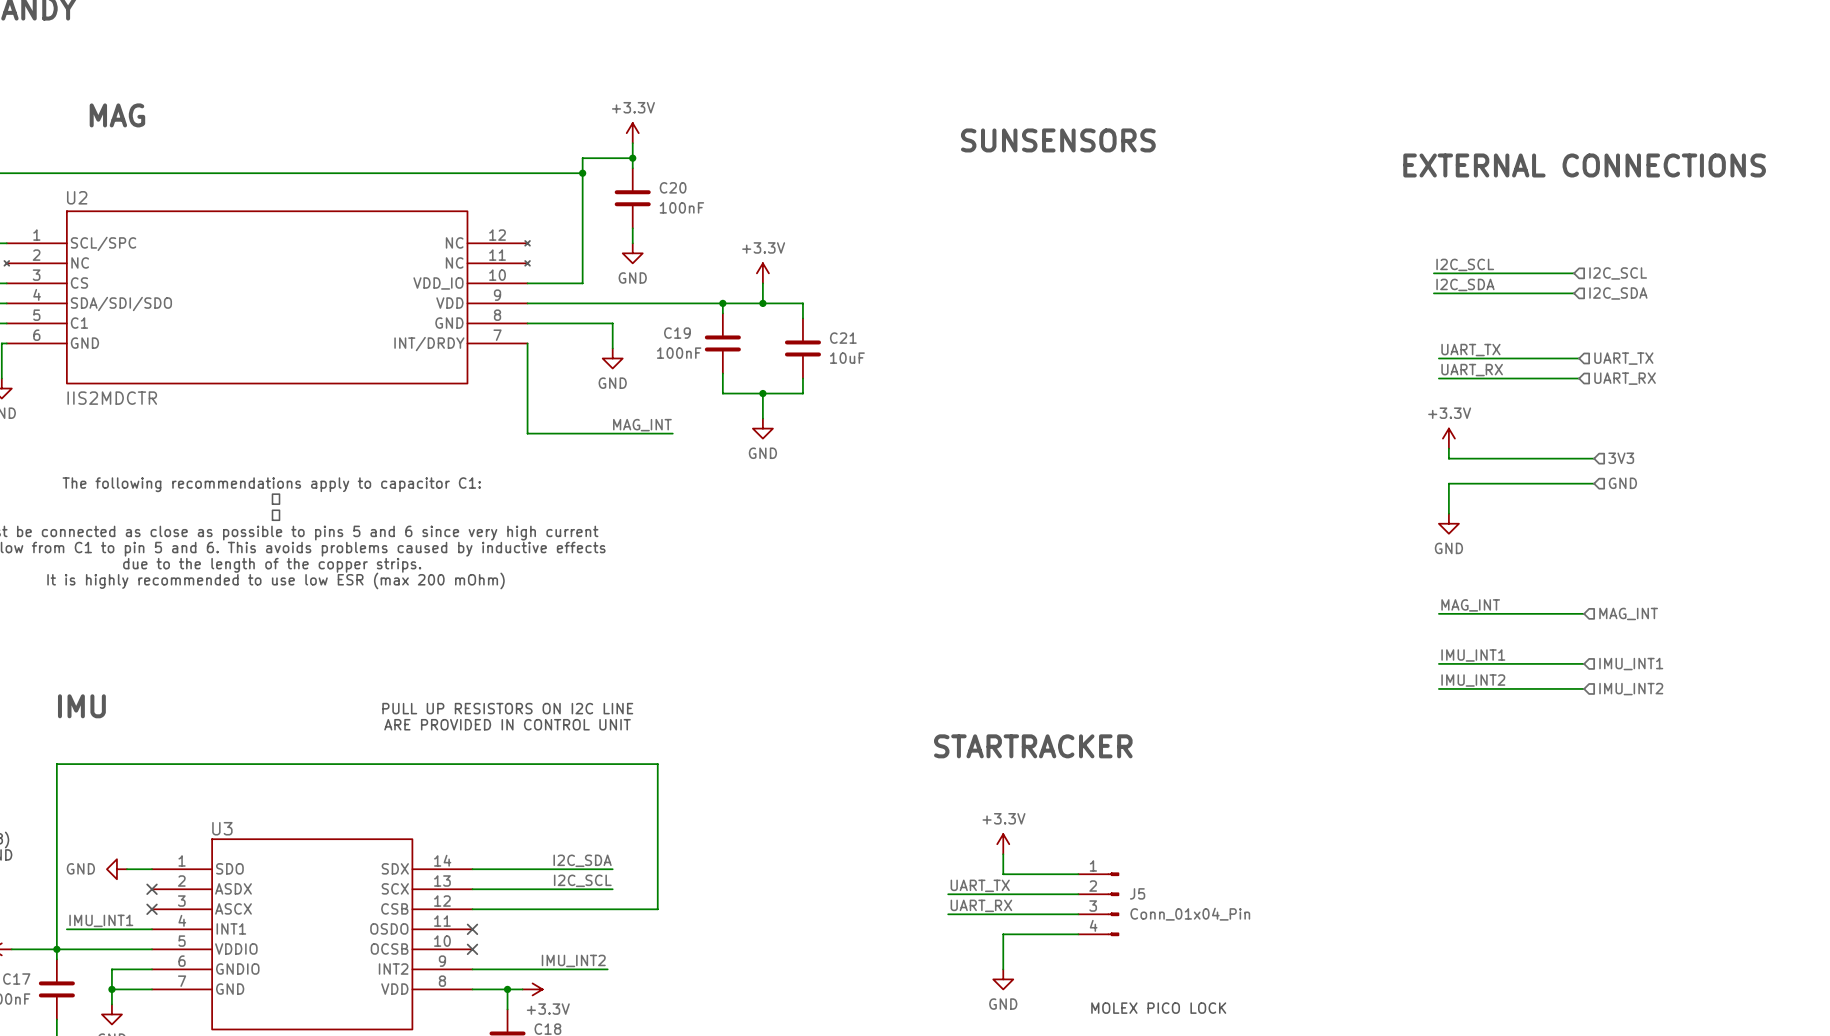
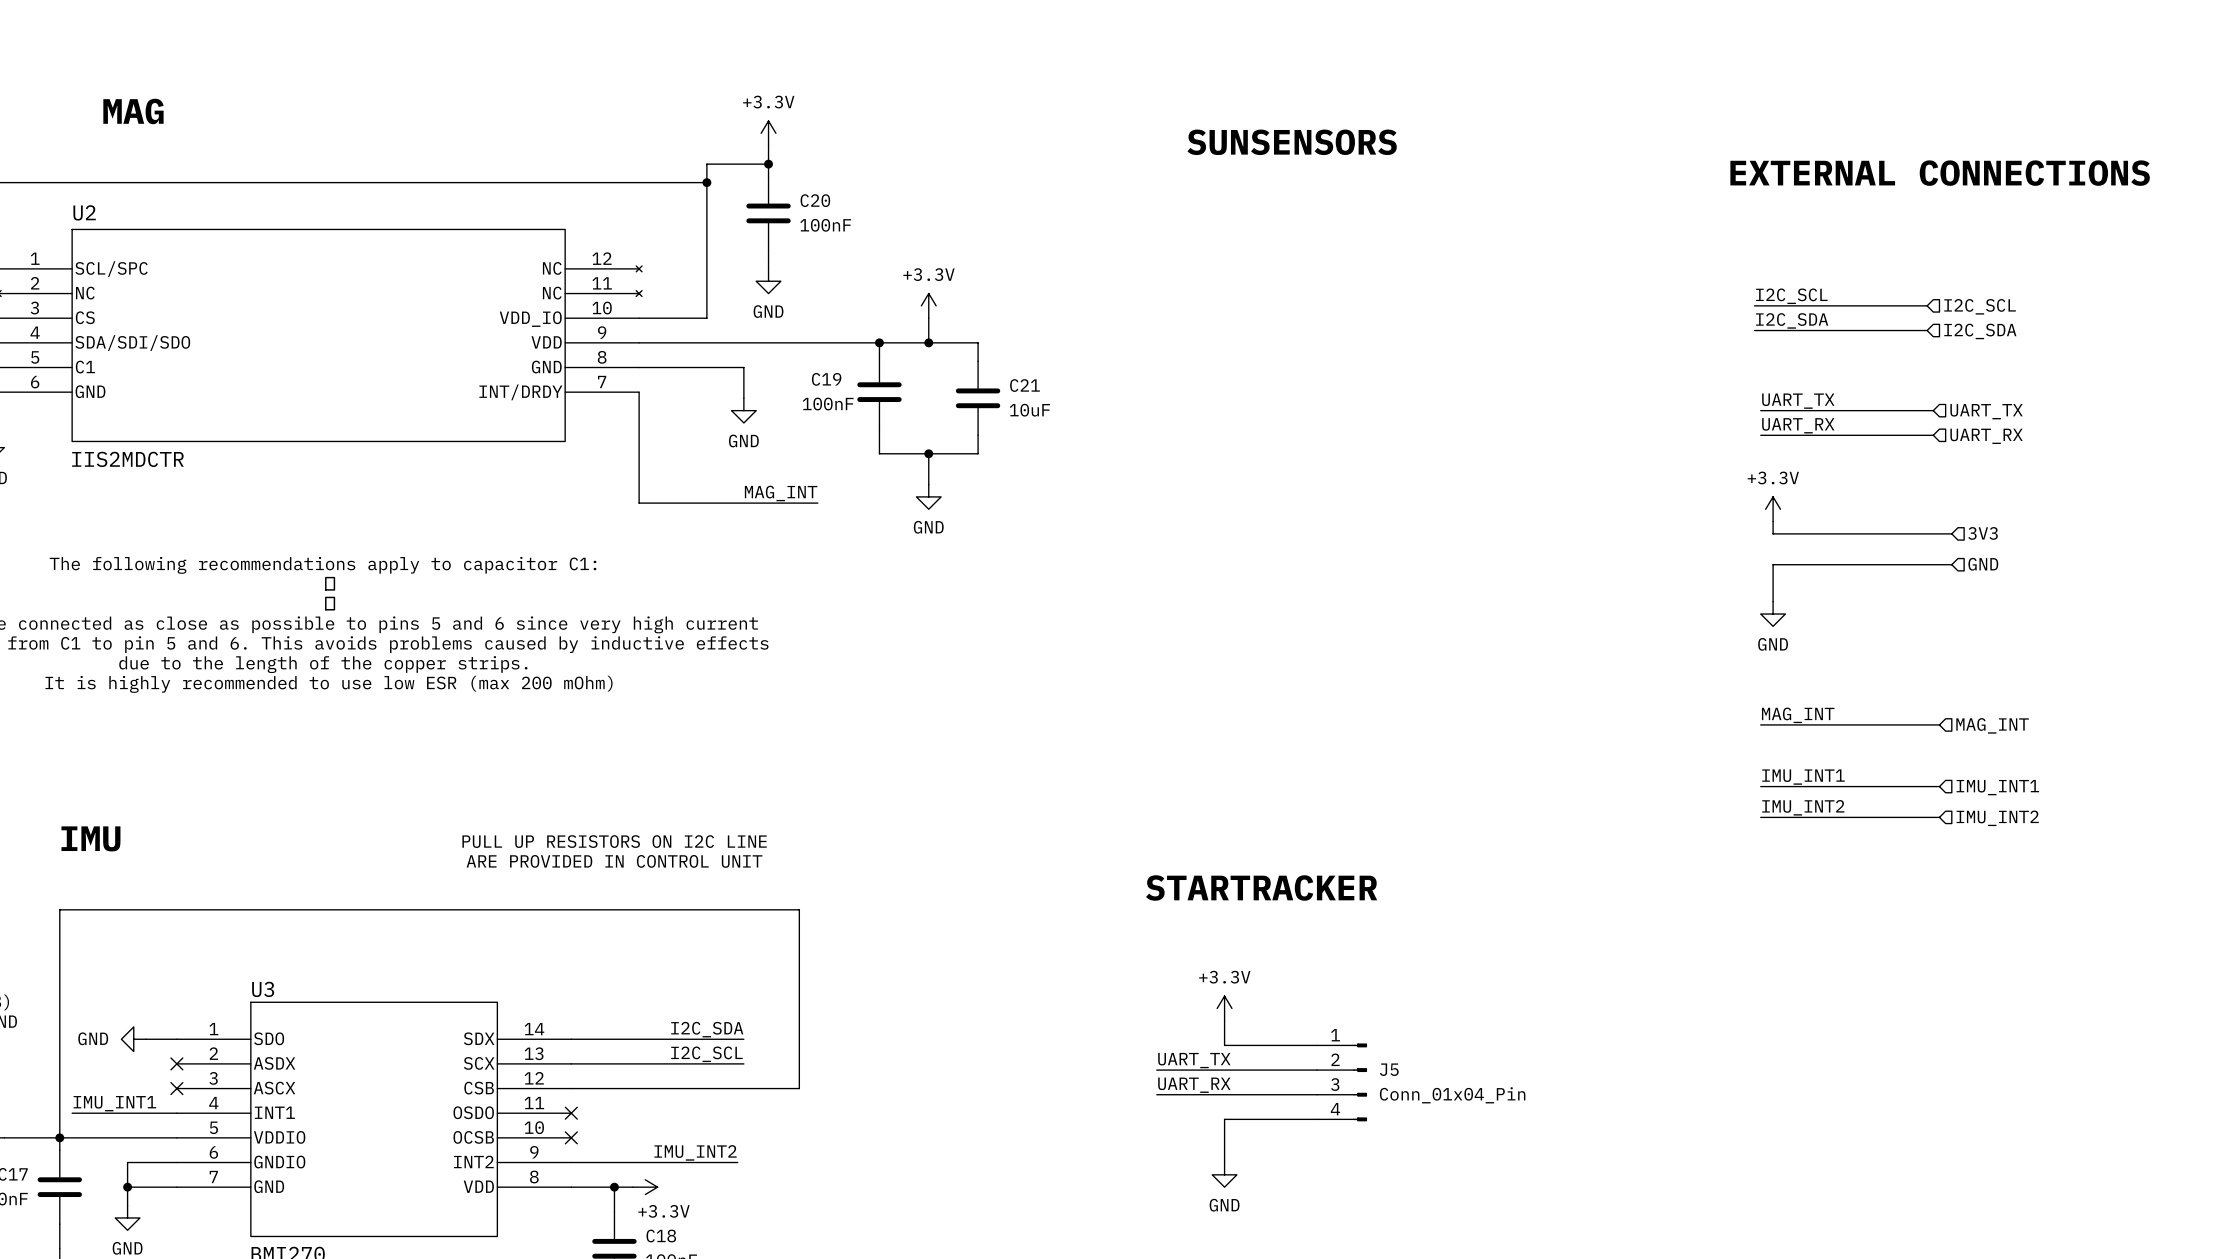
text: MOLEX PICO LOCK (1158, 1008) -> none

